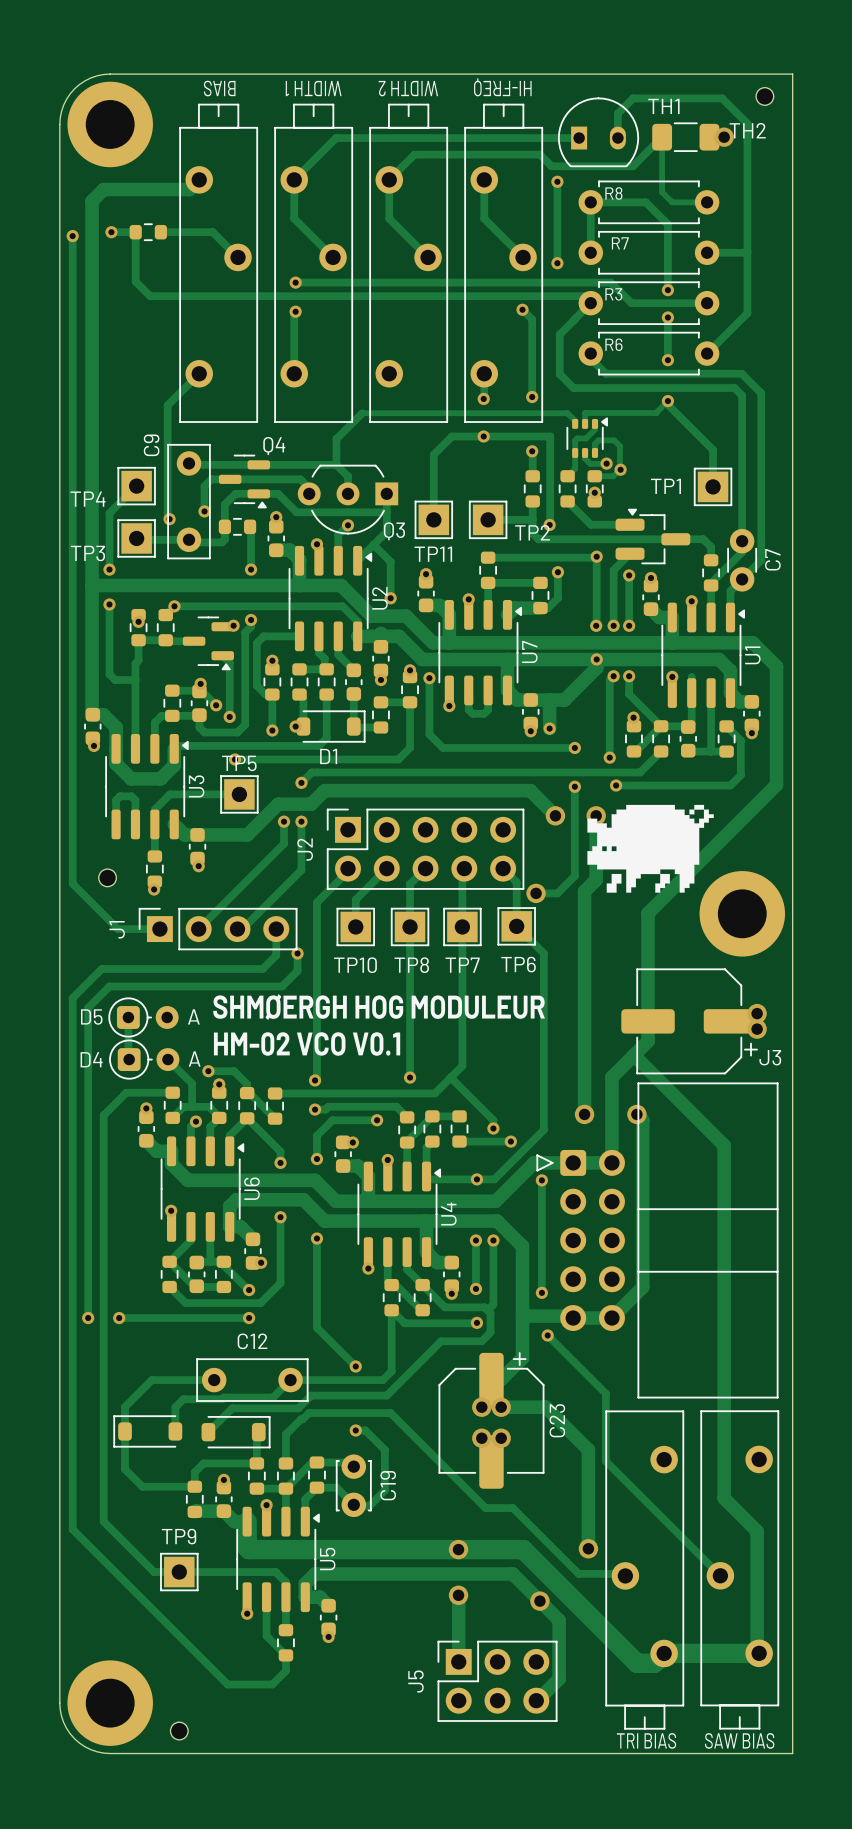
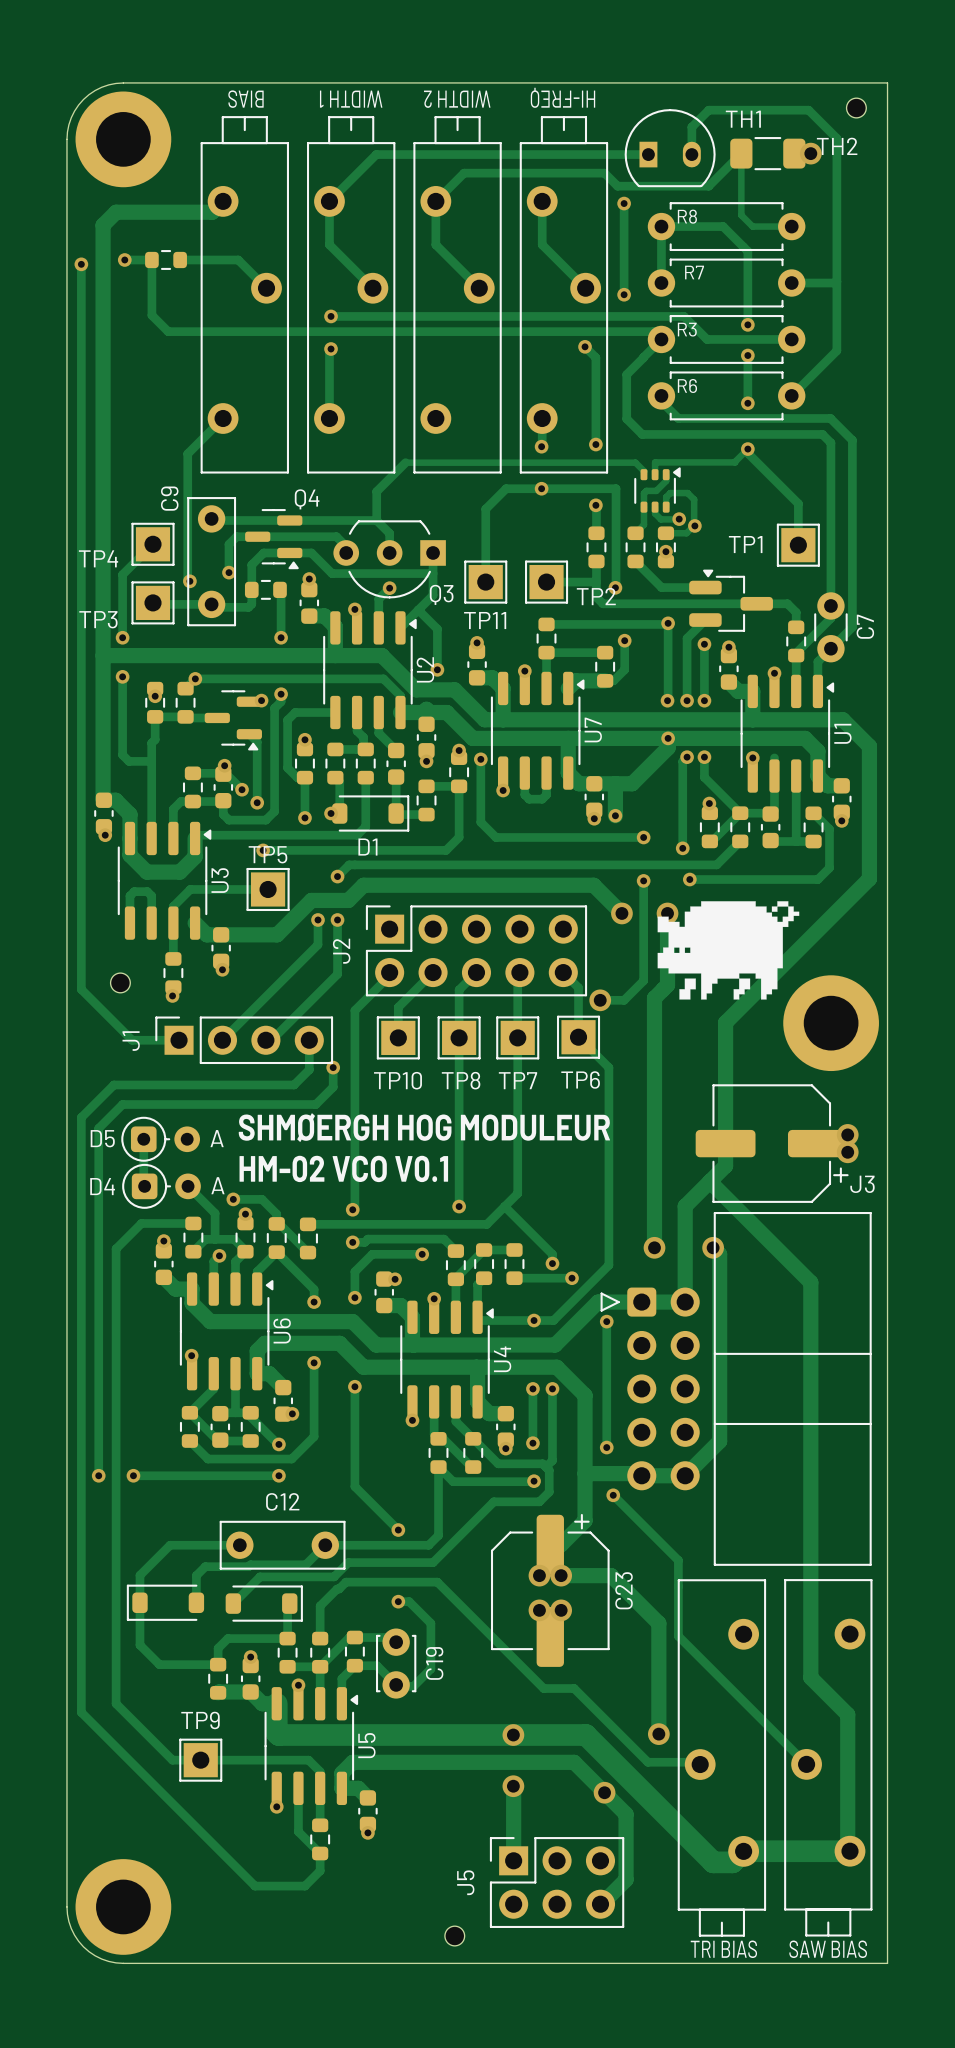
part position: (179, 1731) -> (454, 1936)

